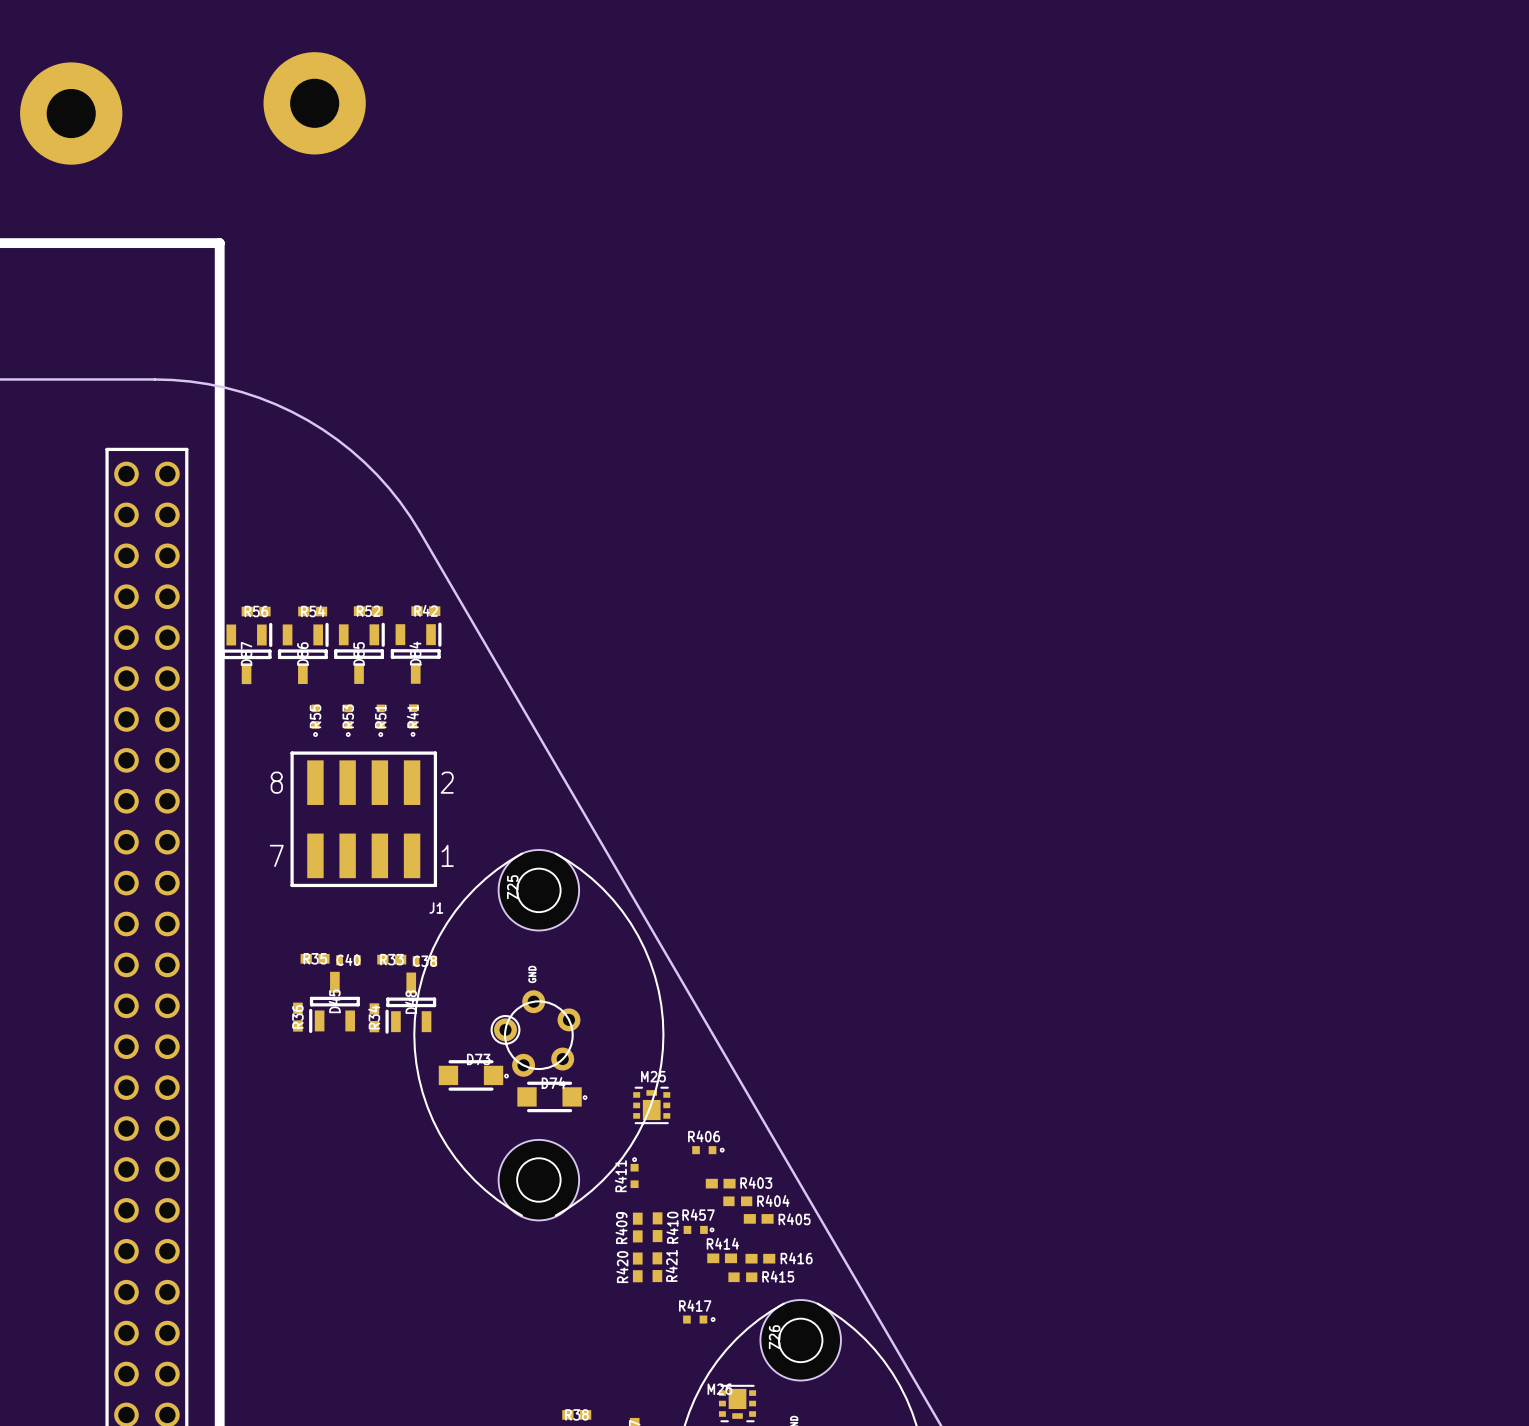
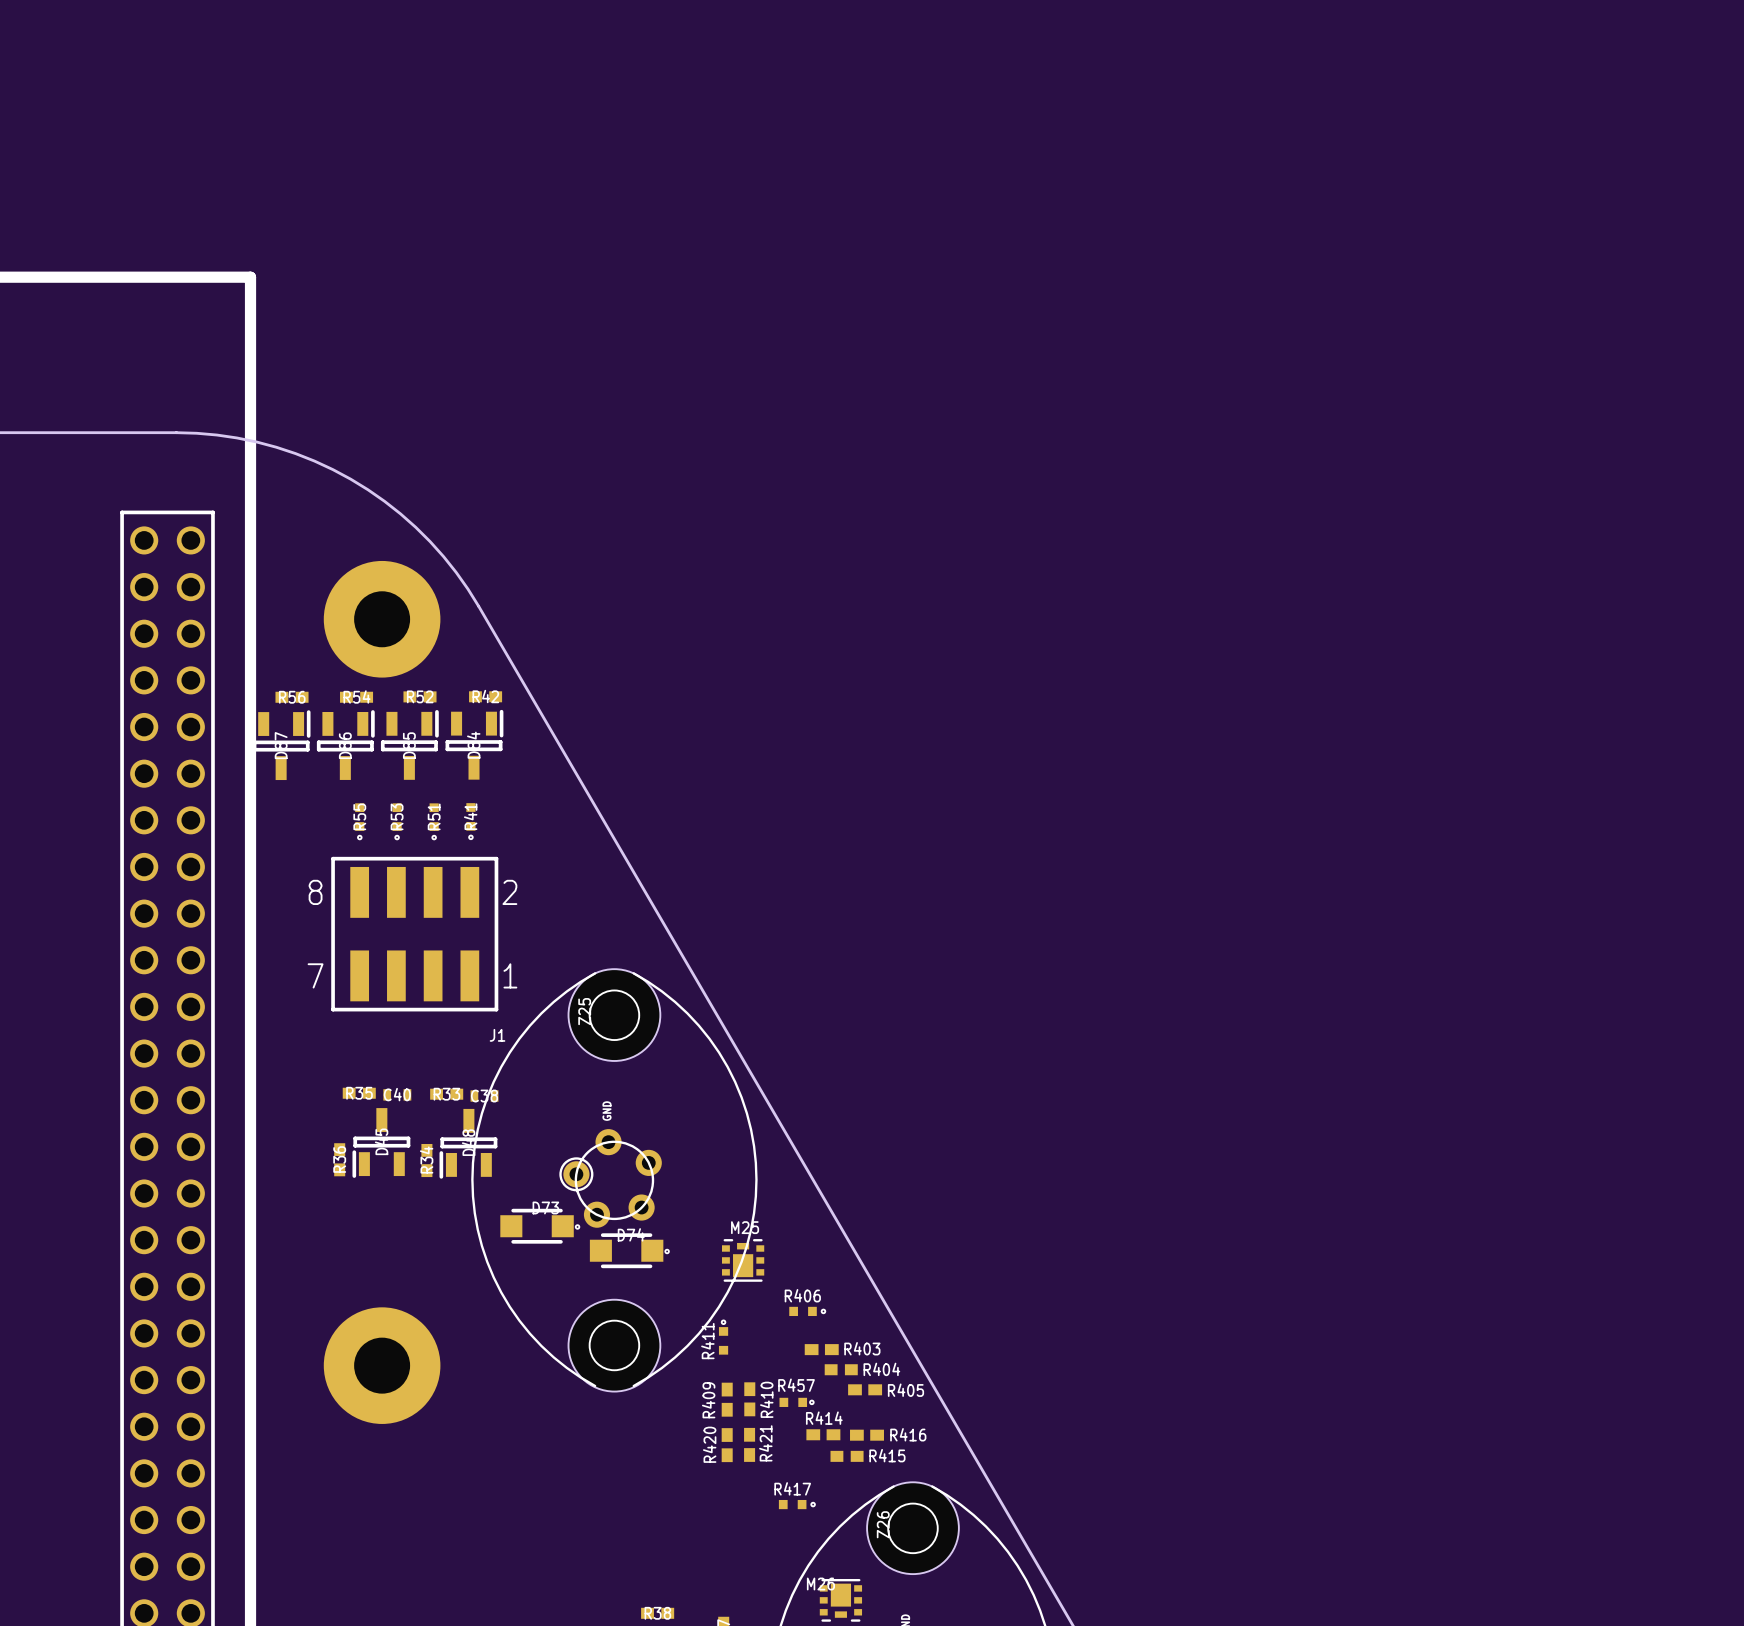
part: (314, 103) -> none
part: (71, 113) -> none
part: none -> (382, 619)
part: none -> (382, 1365)

